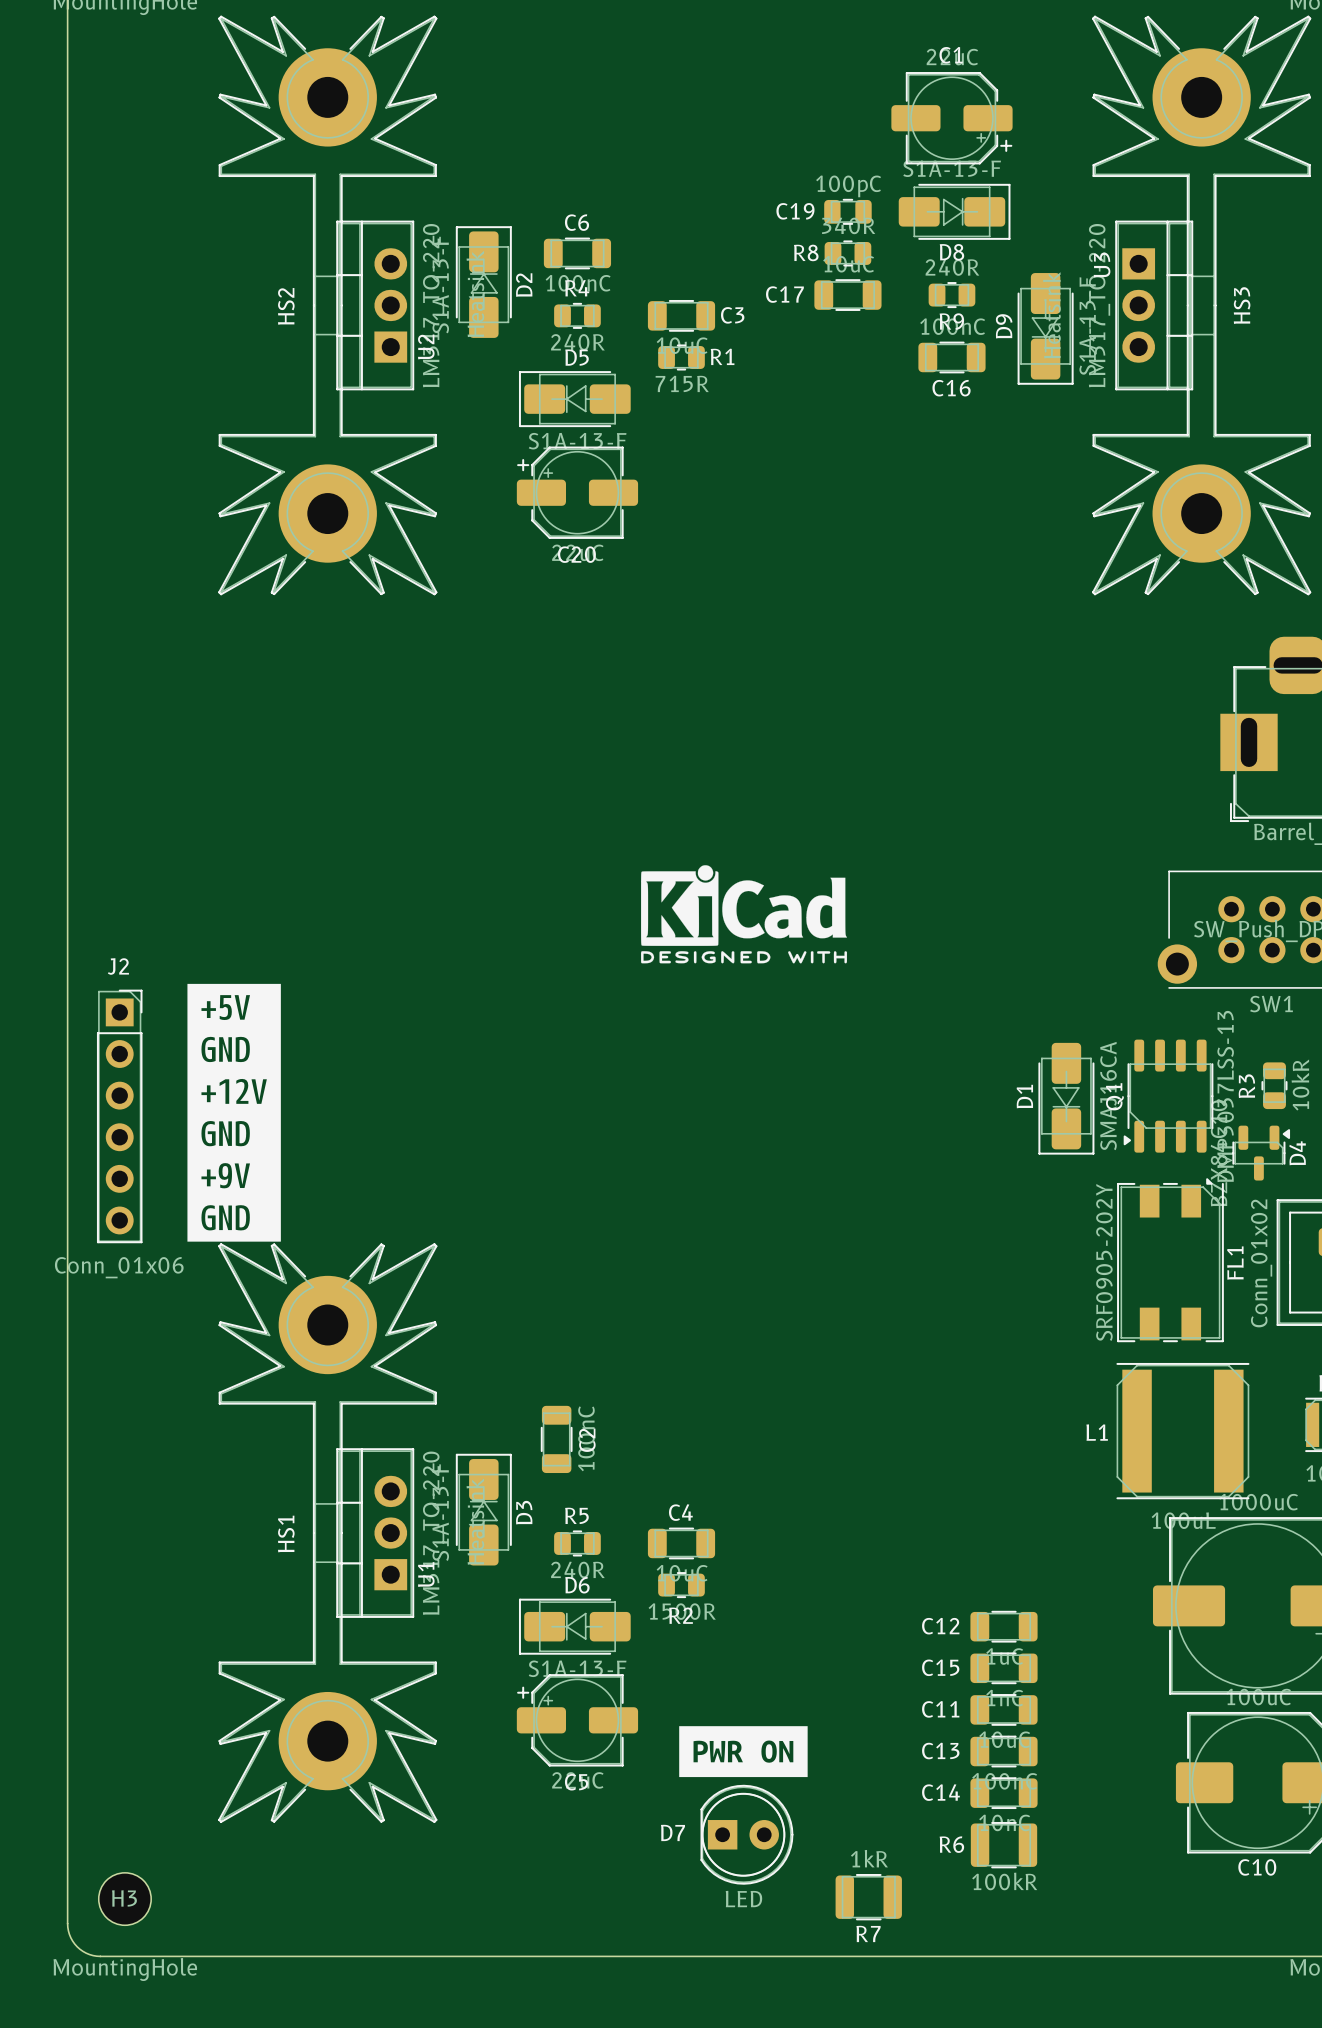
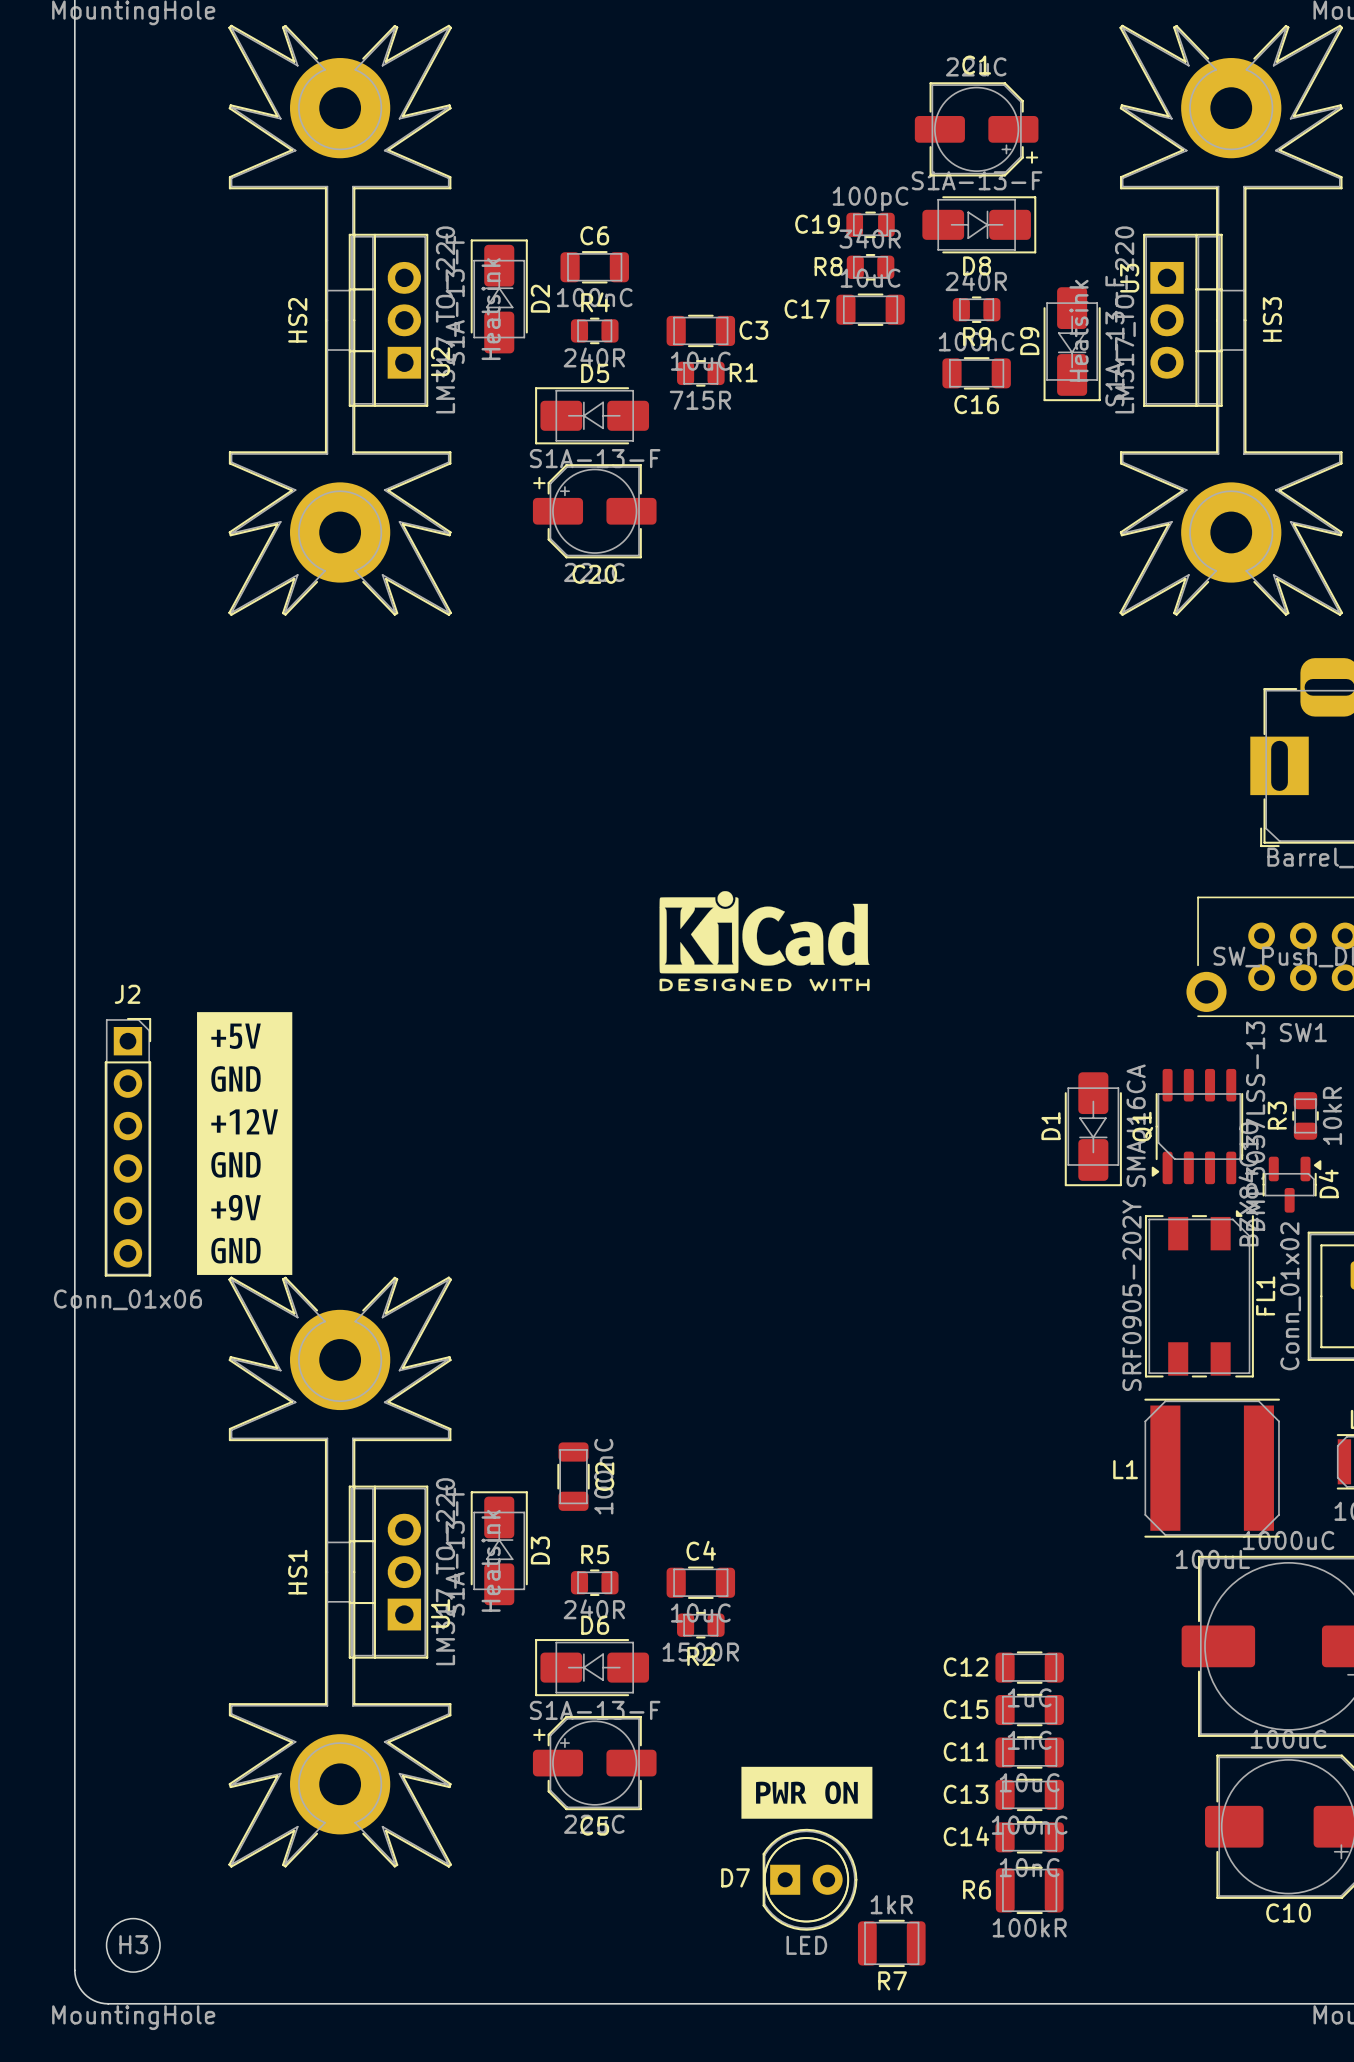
drawing position: (743, 1751) -> (806, 1792)
D7 position: (746, 1834) -> (810, 1879)

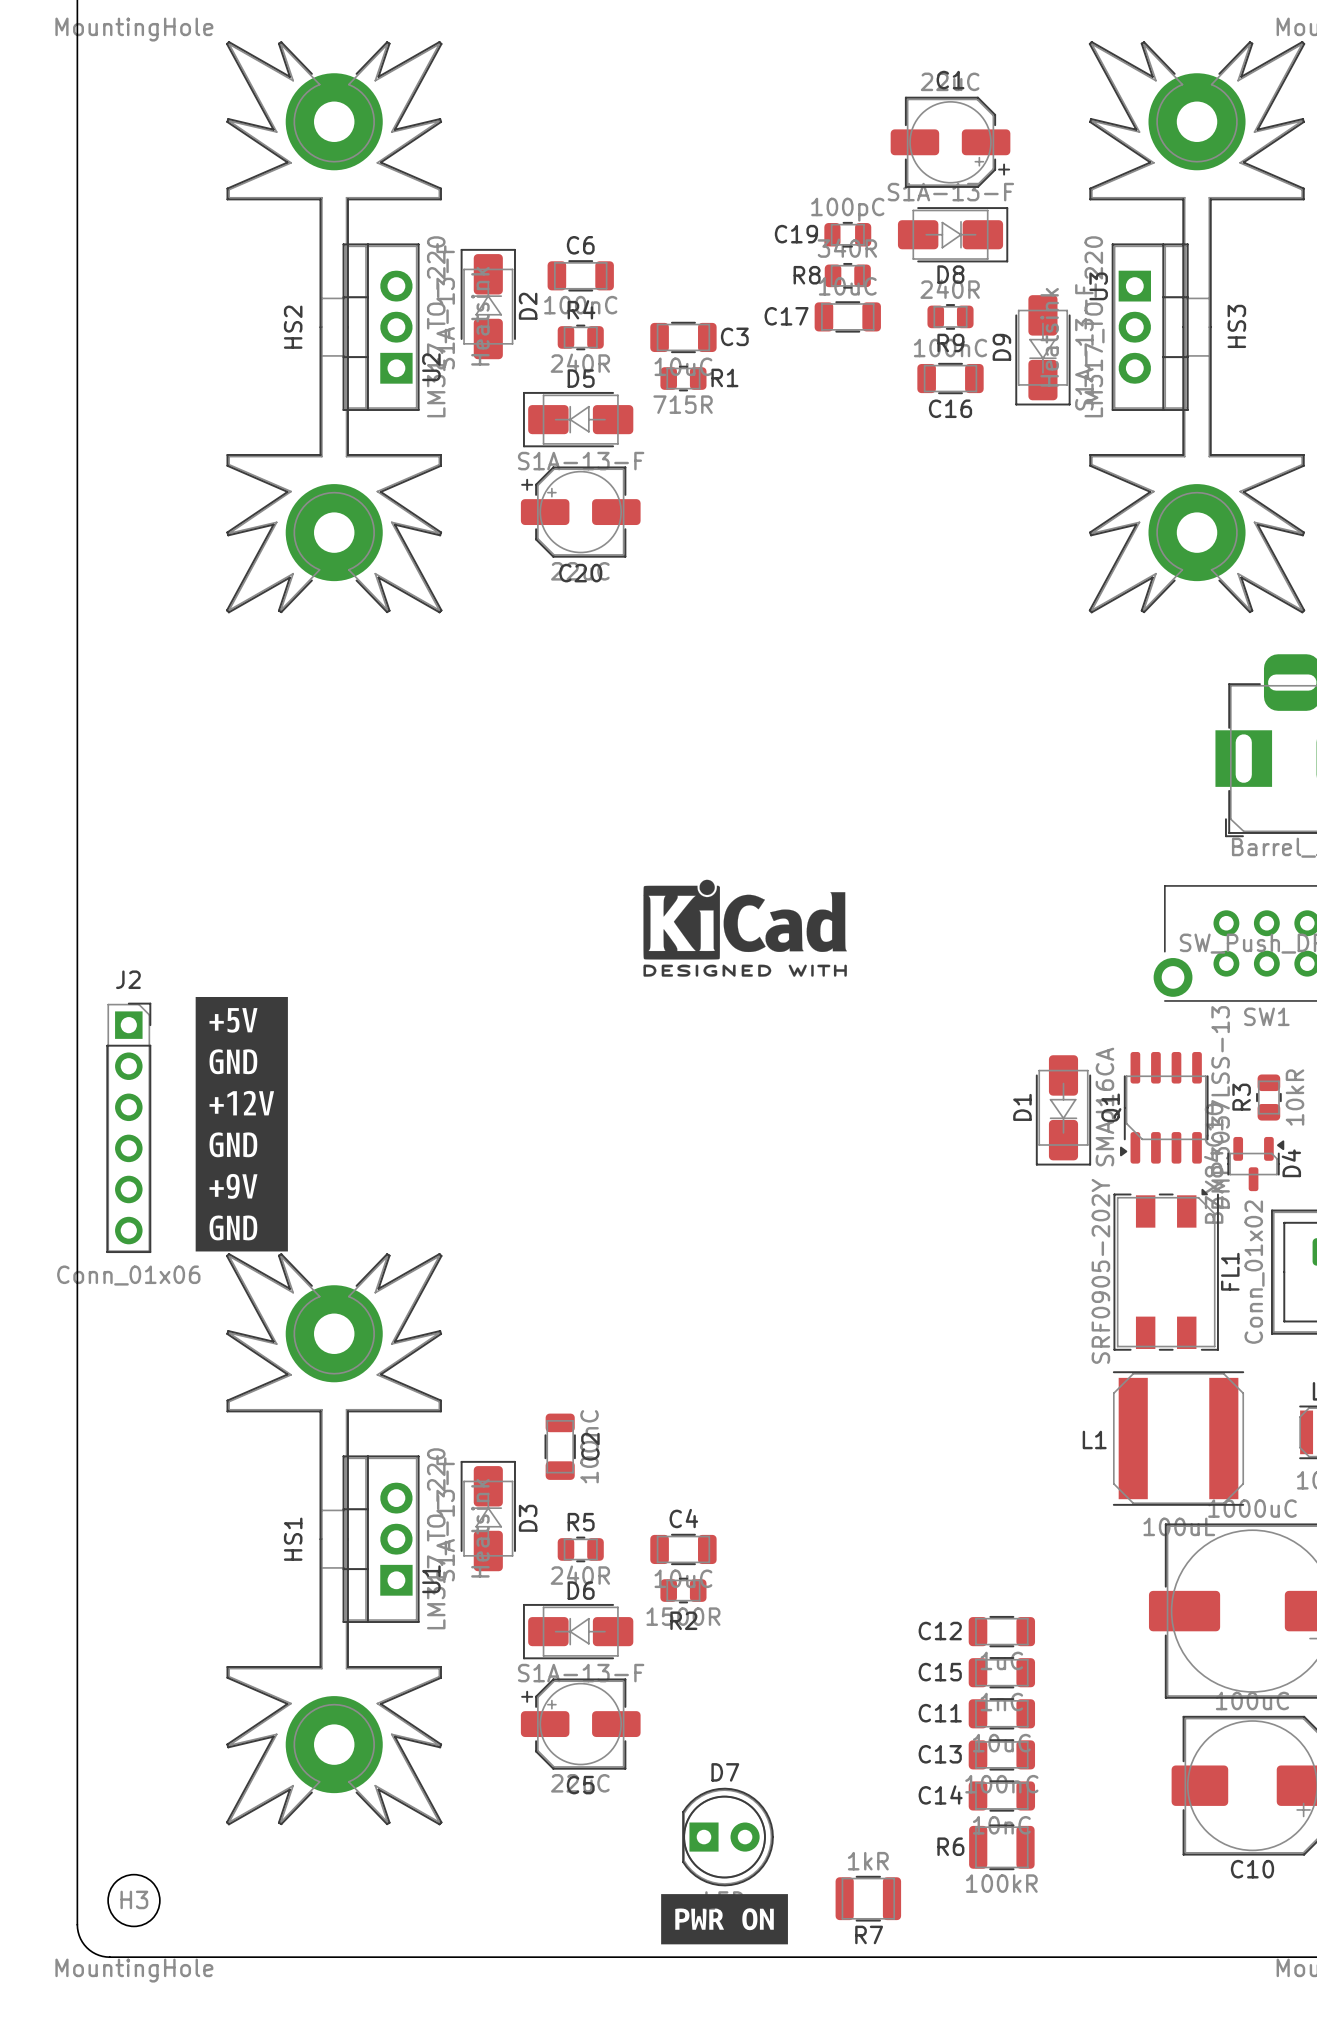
drawing position: (806, 1792) -> (724, 1919)
D7 name position: D7 (735, 1877) -> D7 (725, 1772)
D7 position: (810, 1879) -> (728, 1837)

